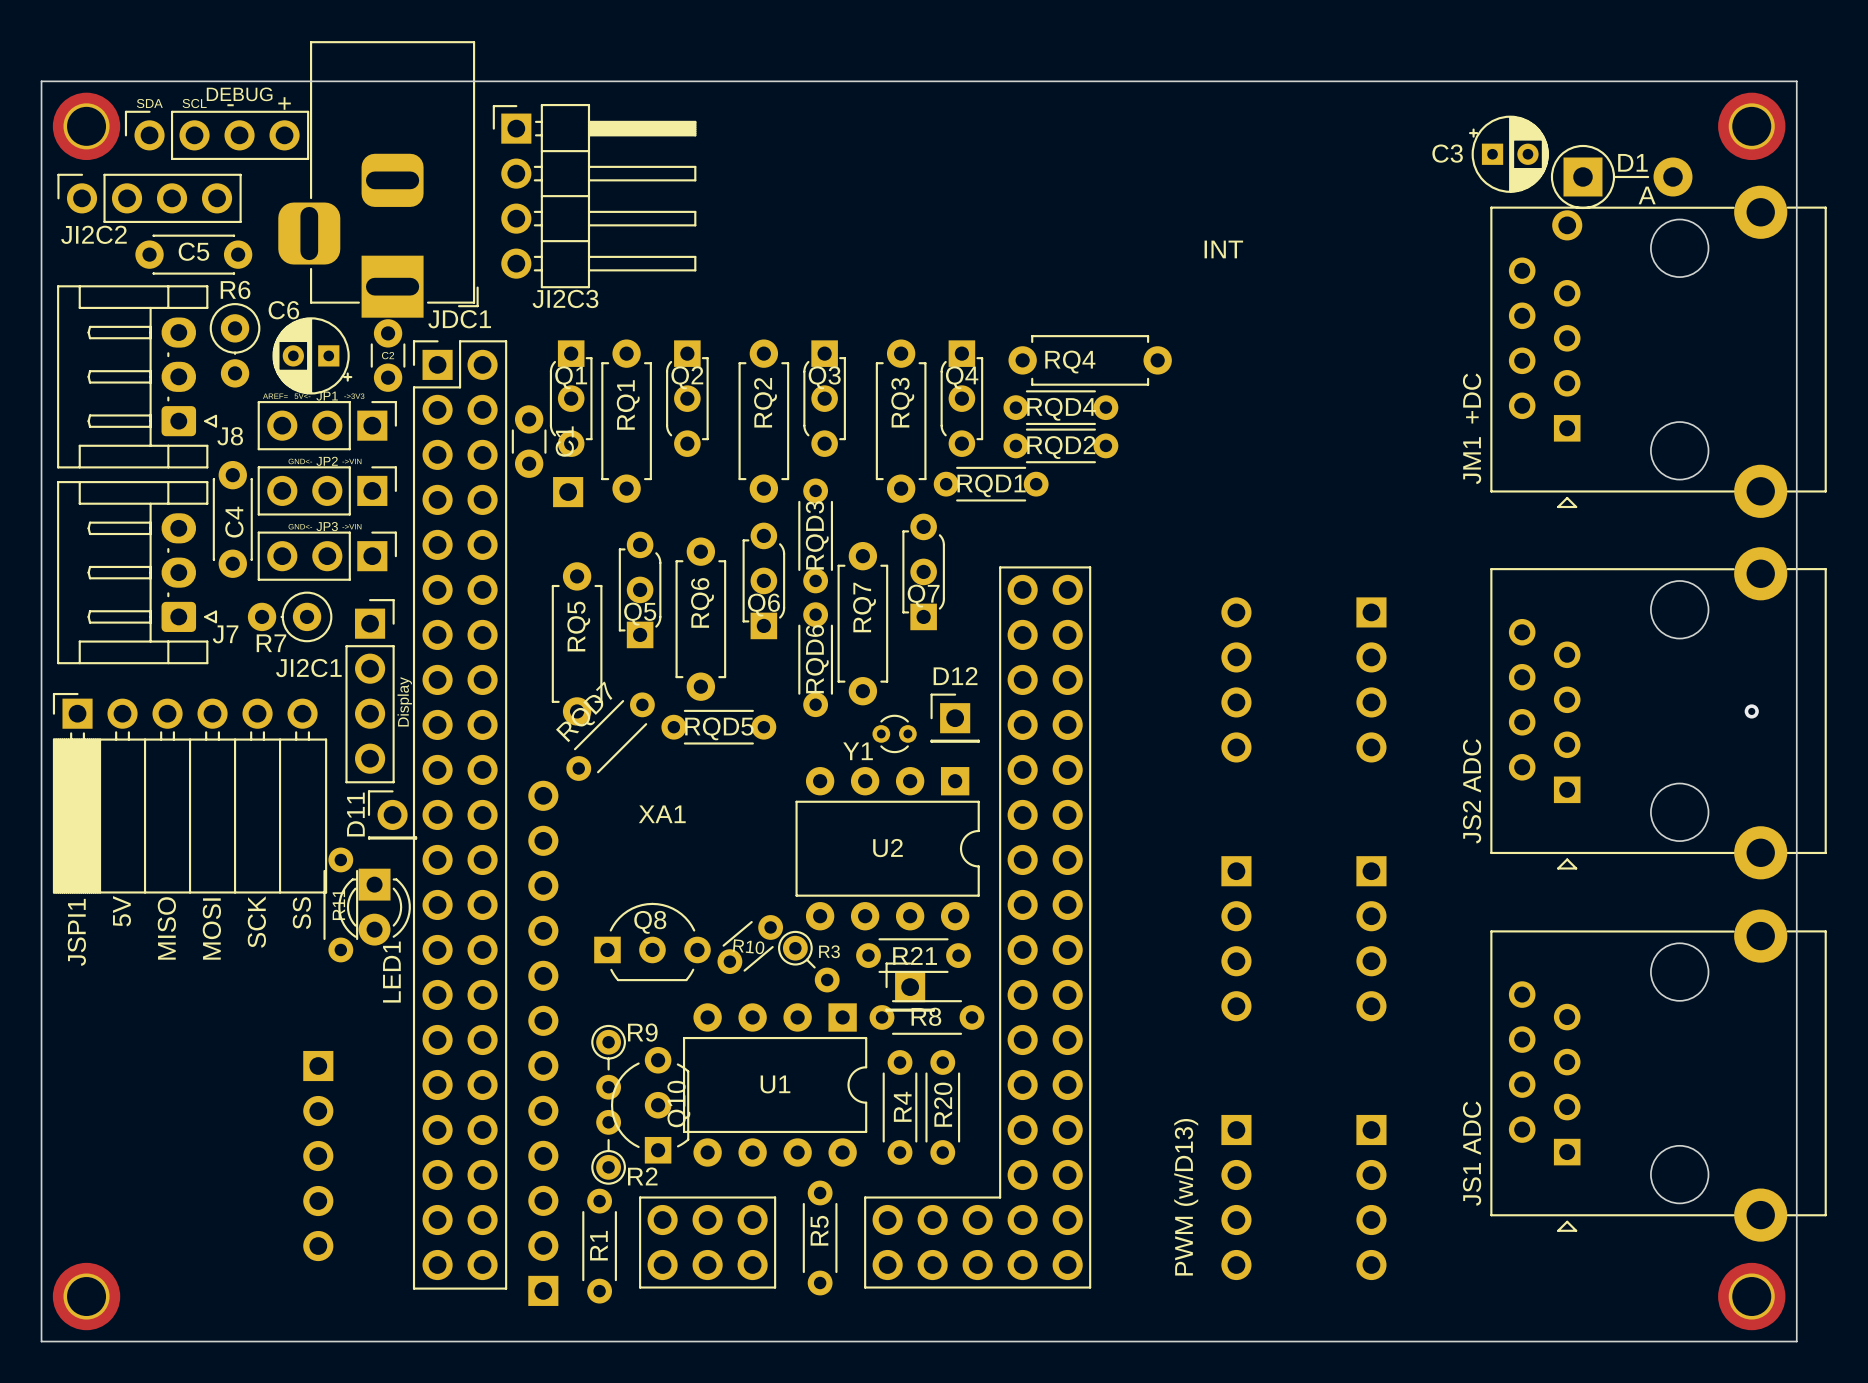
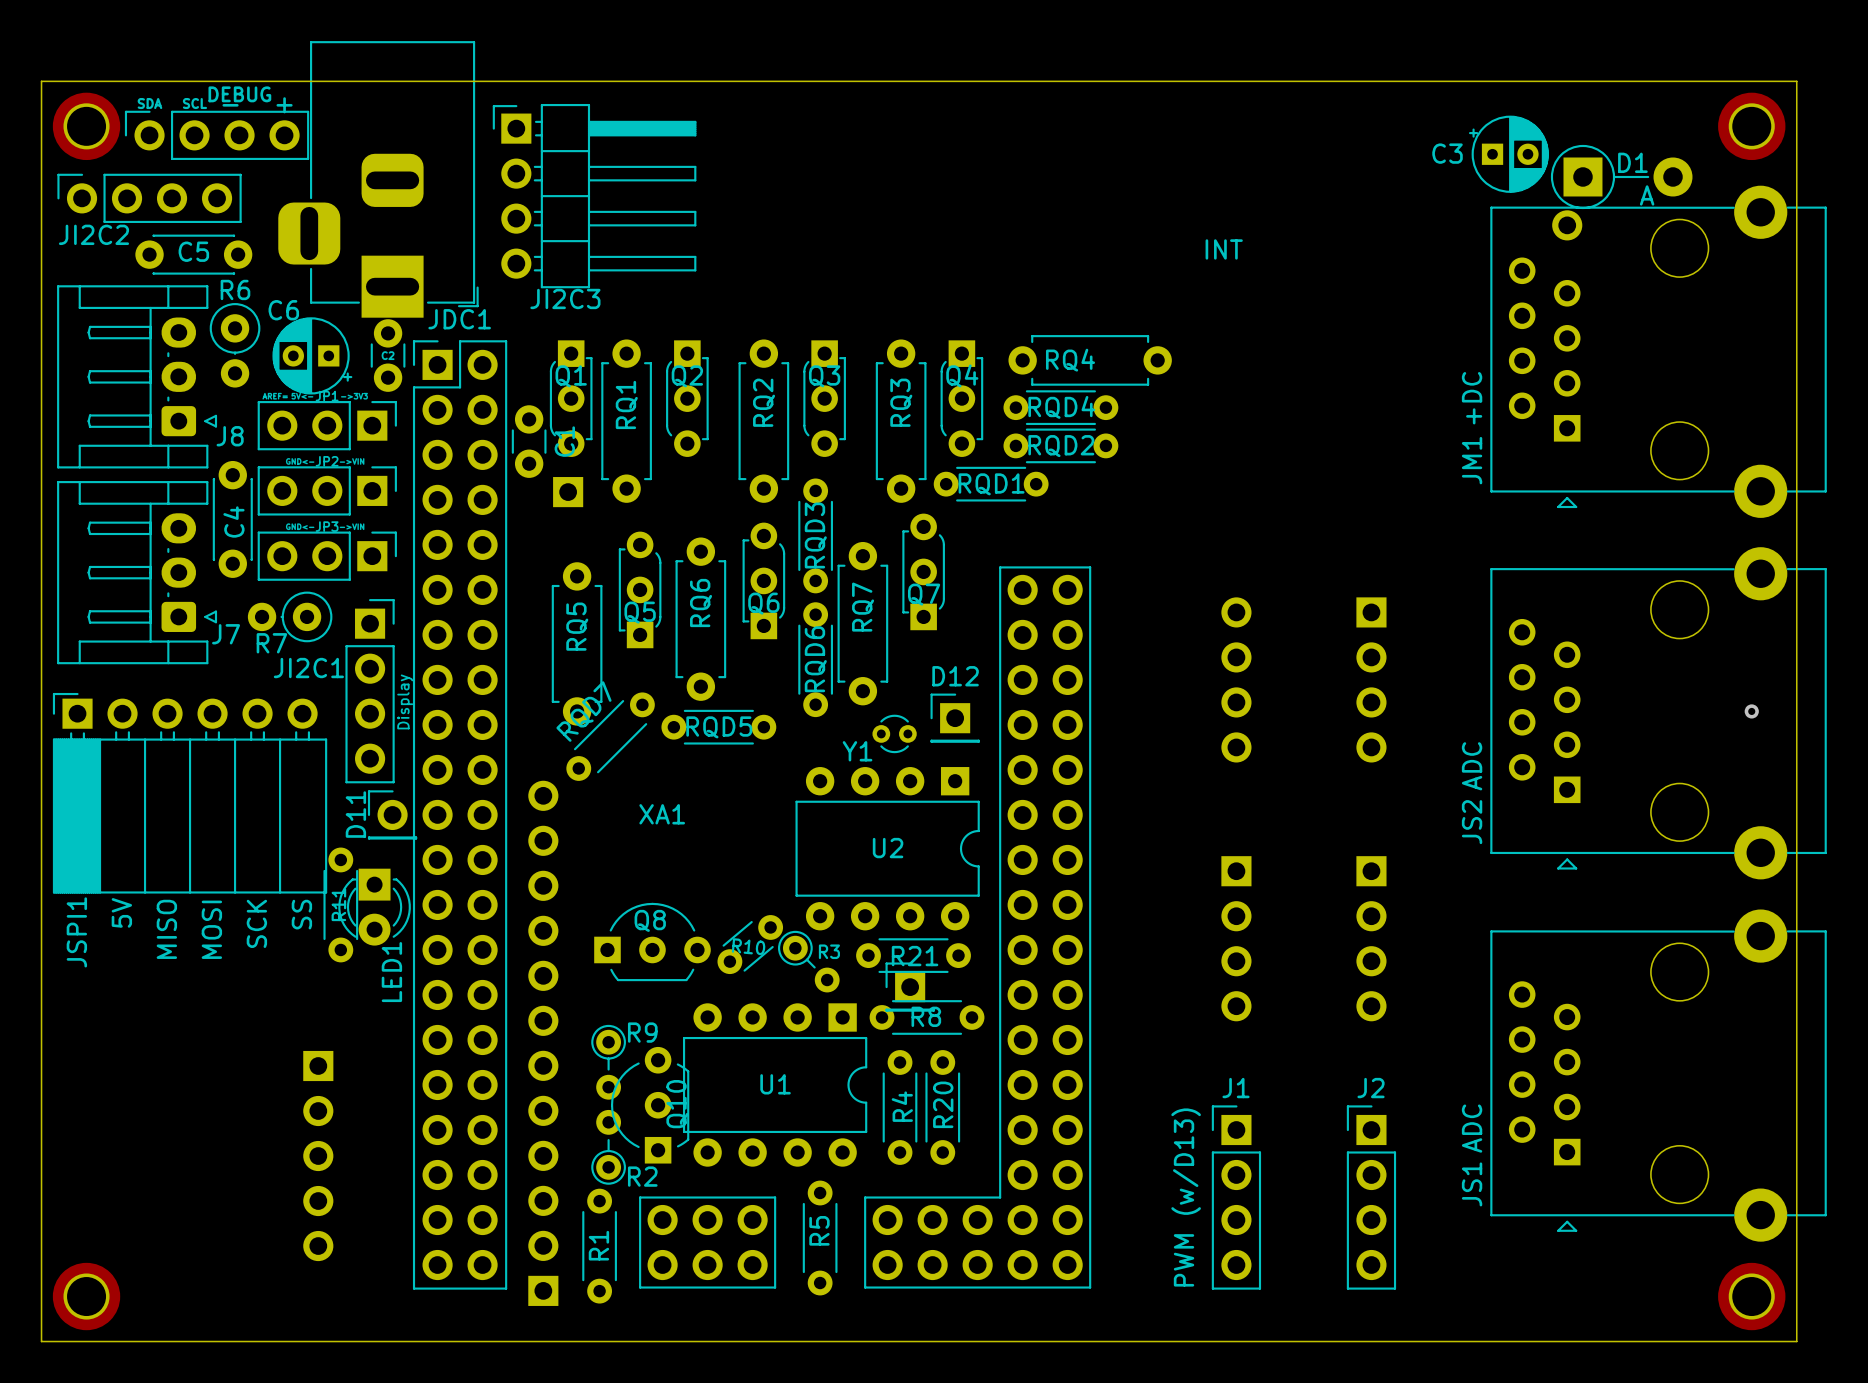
J1 side: bottom (1236, 1197) -> top (1236, 1197)
J2 side: bottom (1371, 1197) -> top (1371, 1197)

